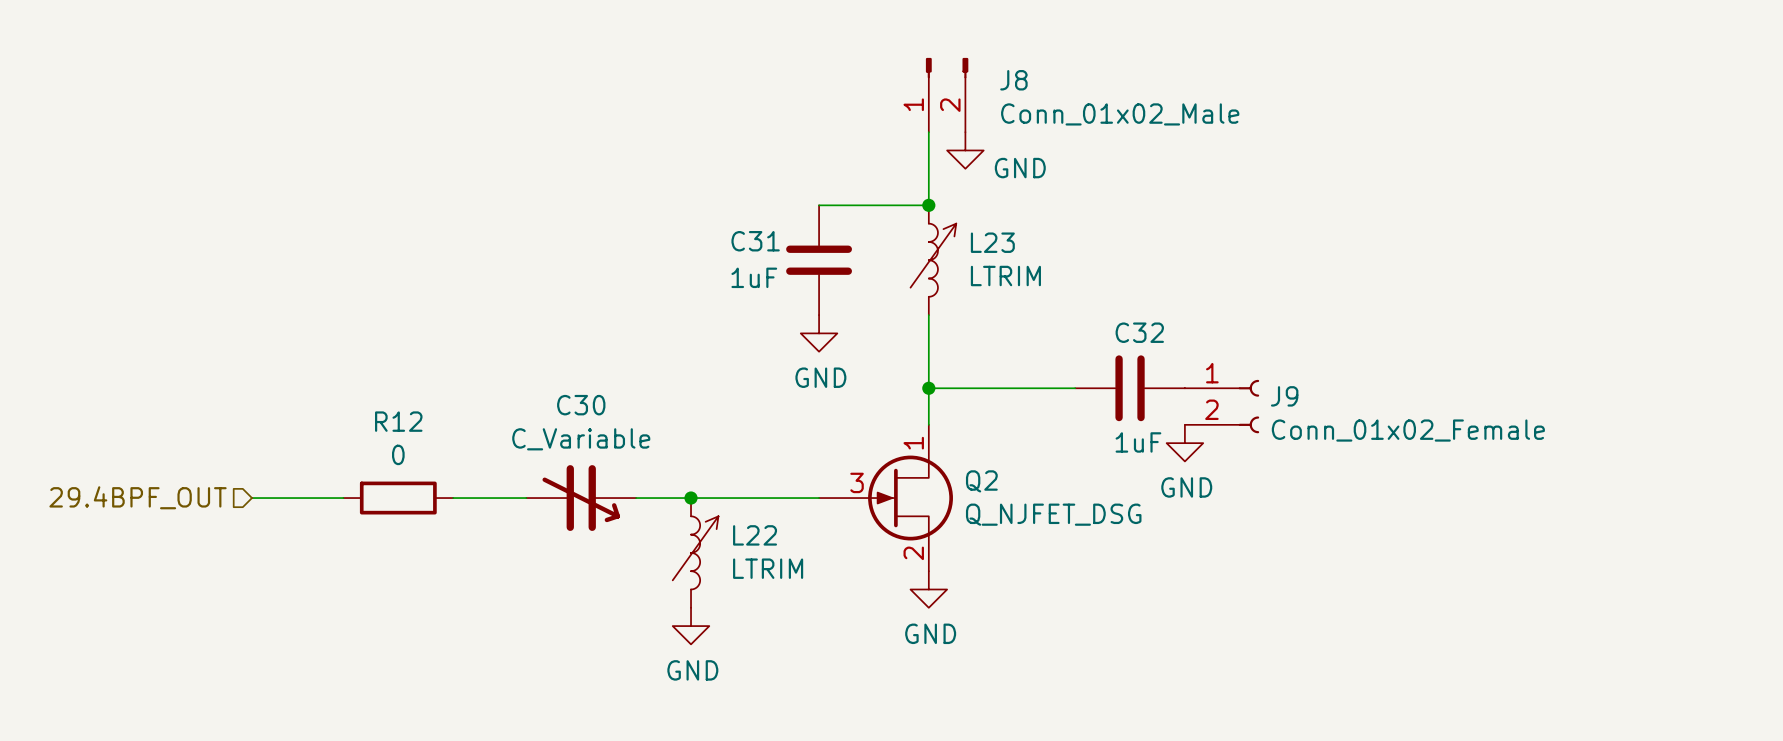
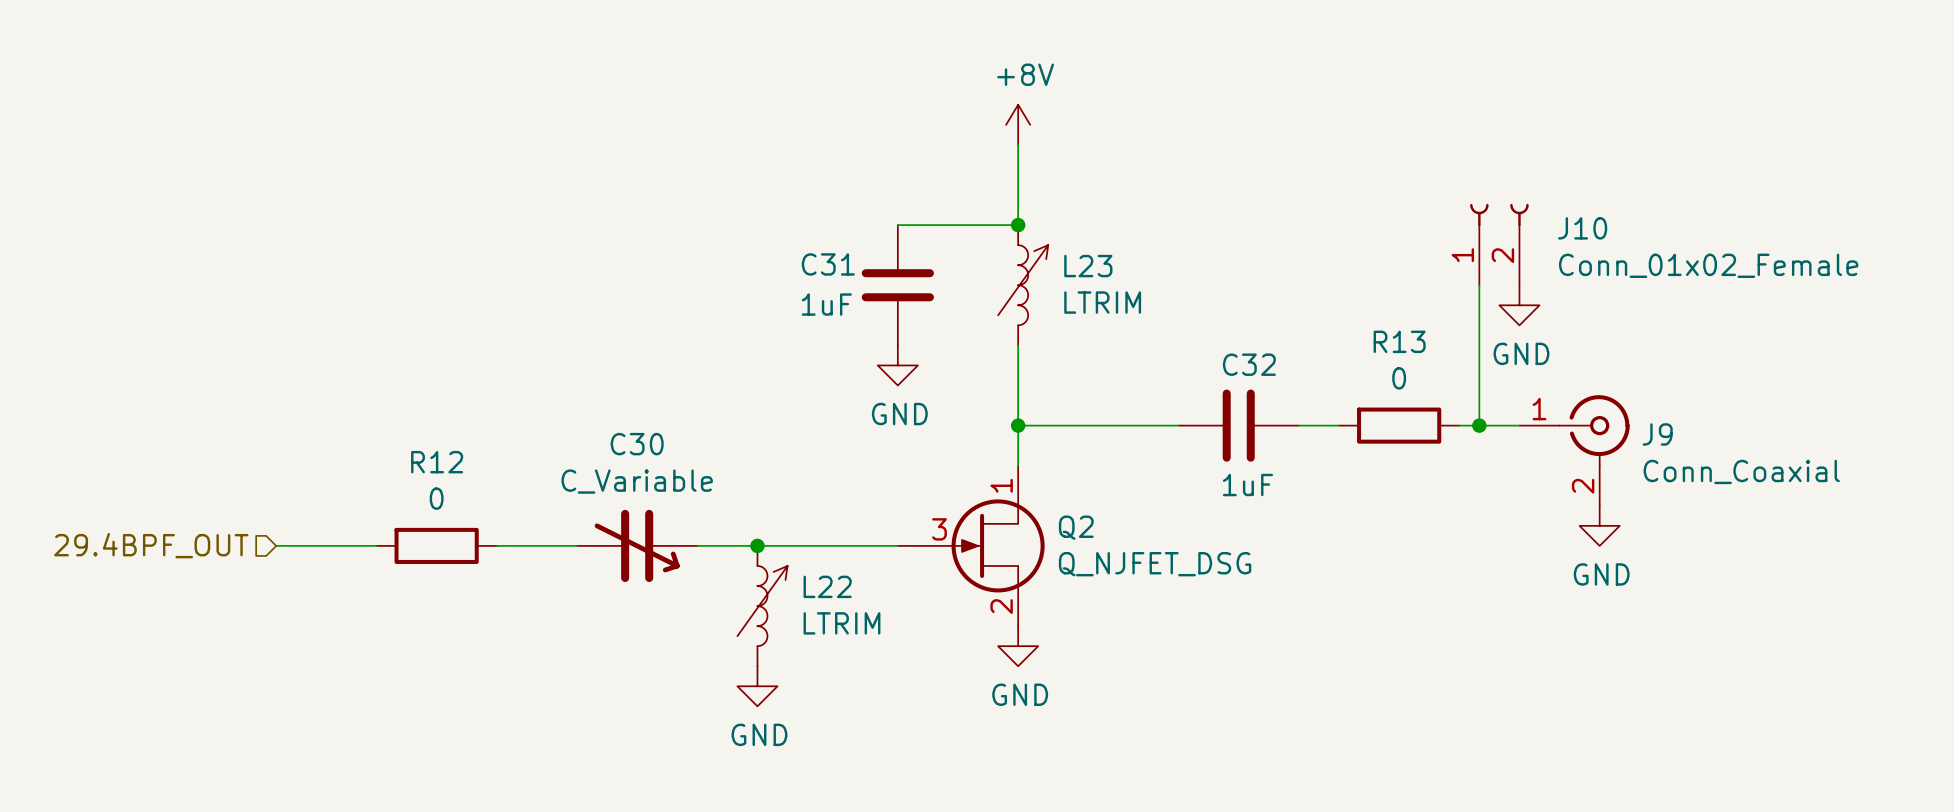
J8: Conn_01x02_Male (947, 95) -> none
power symbol: none -> +8V (1018, 124)
power symbol: GND (965, 150) -> none
J10: none -> Conn_01x02_Female (1499, 244)
wire: none -> (1479, 285) (1479, 425)
power symbol: none -> GND (1519, 305)
J9 symbol: [1184, 379, 1260, 434] -> [1519, 395, 1630, 506]
R13: none -> 0 (1399, 425)
wire: none -> (1459, 425) (1519, 425)
junction: none -> (1479, 425)
J9 value: Conn_01x02_Female (1408, 430) -> Conn_Coaxial (1741, 471)
power symbol: GND (1184, 443) -> none
power symbol: none -> GND (1599, 525)

